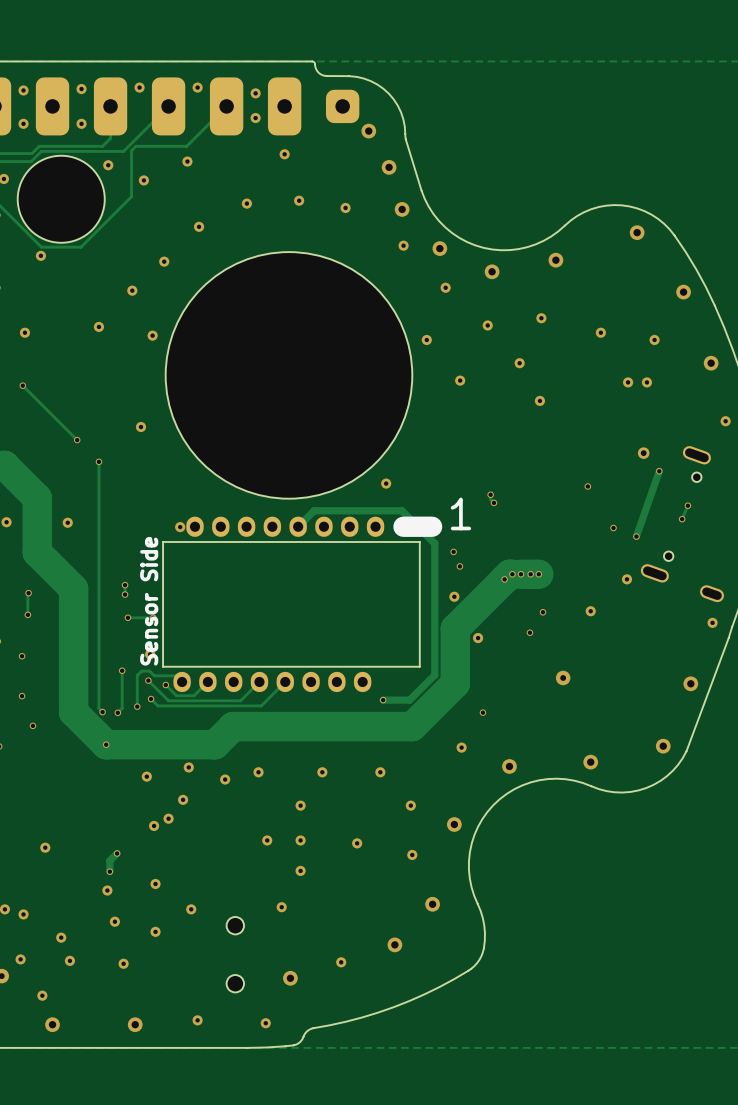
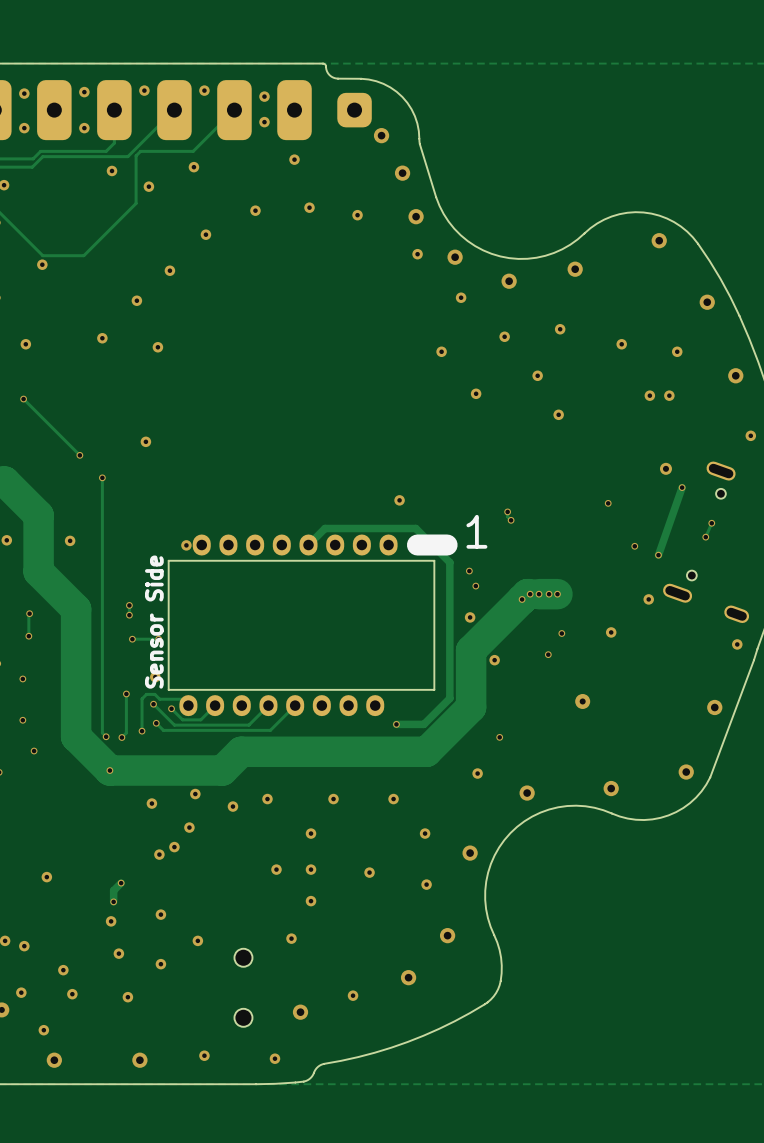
part: (61, 199) -> none
part: (288, 375) -> none

